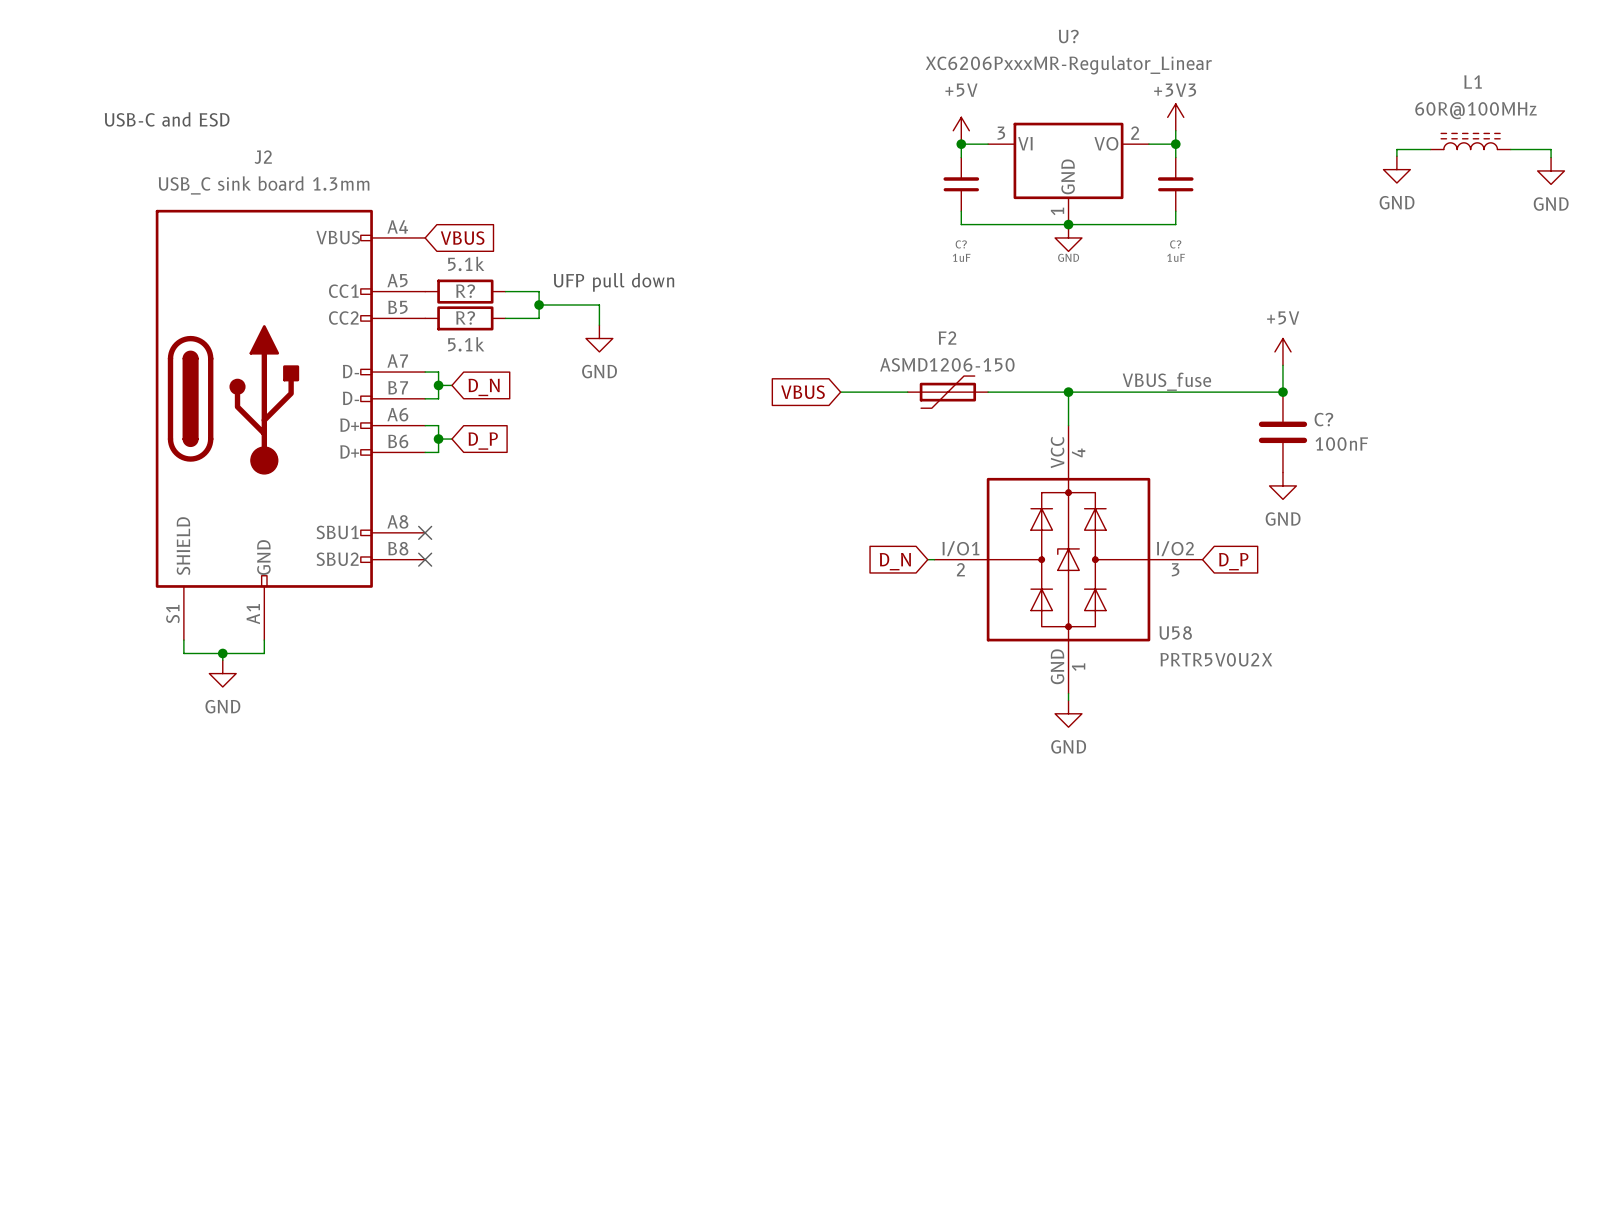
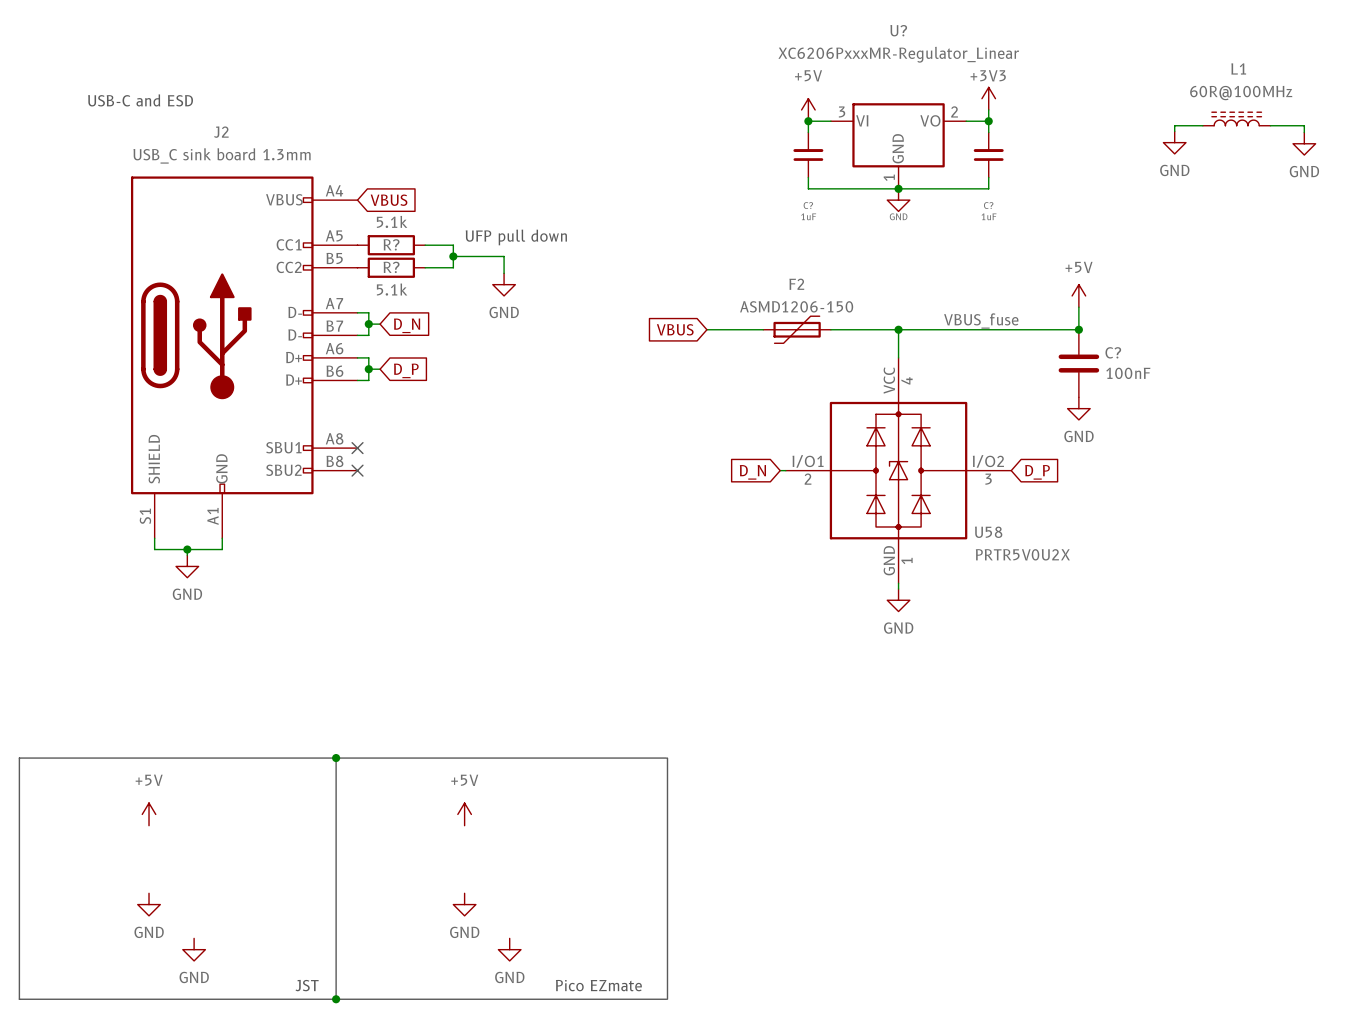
bus: none -> (336, 758) (336, 999)
junction: none -> (336, 758)
bus: none -> (666, 758) (19, 758) (19, 999) (666, 999)
bus: none -> (667, 758) (667, 999)
power symbol: none -> +5V (149, 814)
power symbol: none -> +5V (464, 814)
power symbol: none -> GND (149, 904)
power symbol: none -> GND (464, 904)
power symbol: none -> GND (194, 949)
power symbol: none -> GND (509, 949)
text: none -> JST (307, 985)
text: none -> Pico EZmate (598, 985)
junction: none -> (336, 999)

